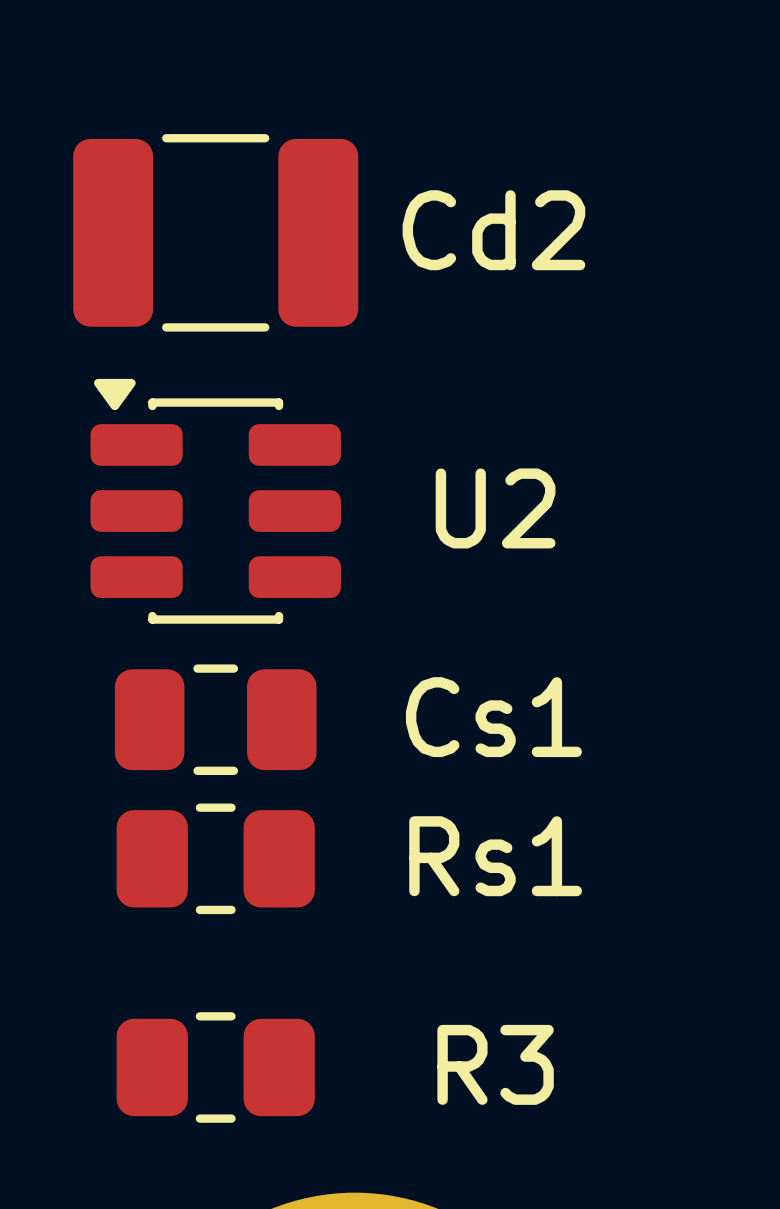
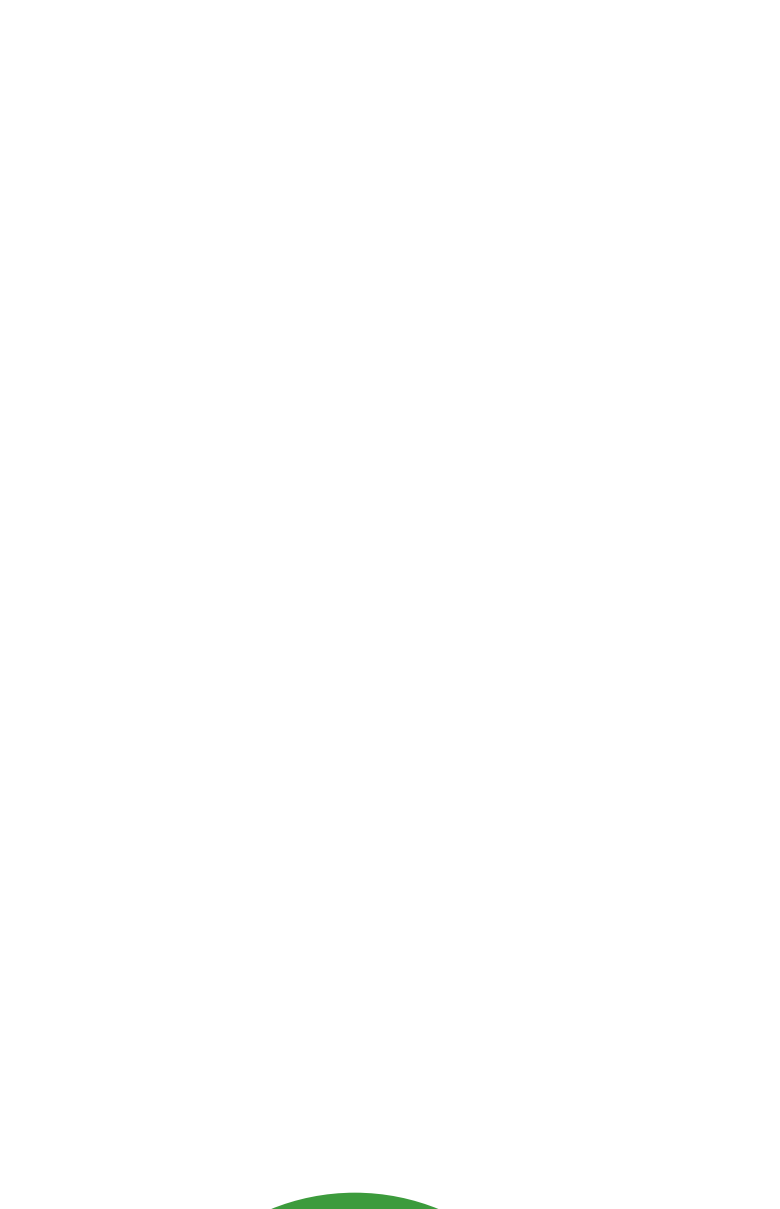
Cd2: (215, 232) -> none
U2: (215, 501) -> none
Cs1: (215, 719) -> none
Rs1: (215, 858) -> none
R3: (215, 1067) -> none

